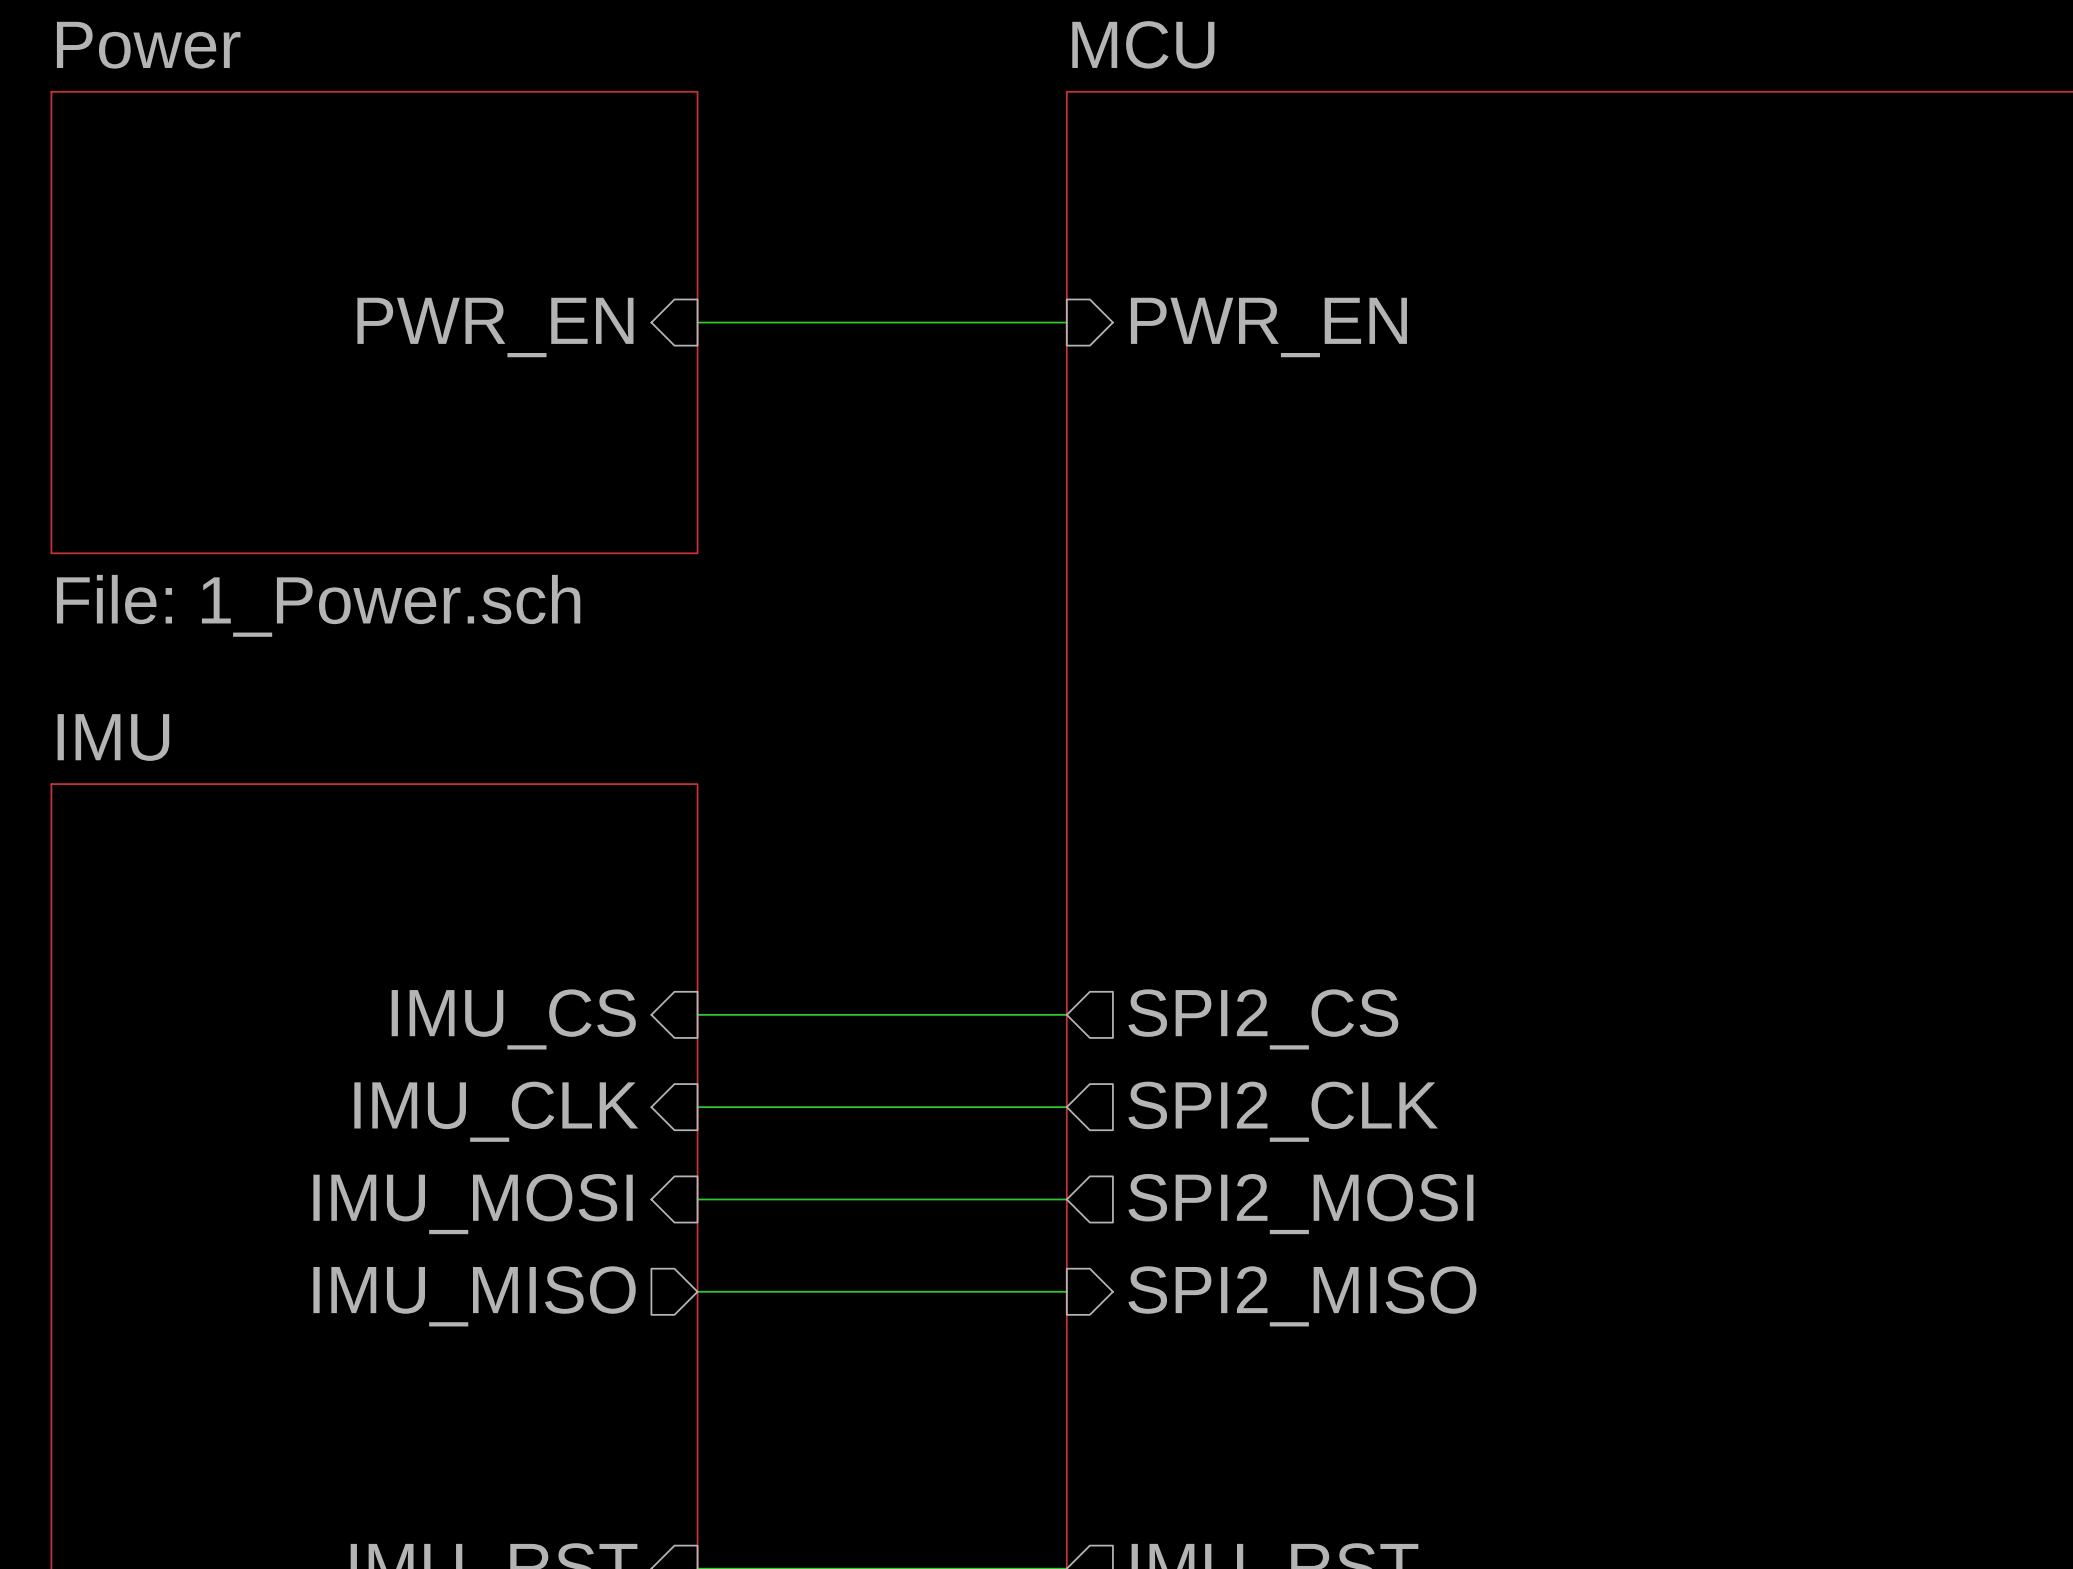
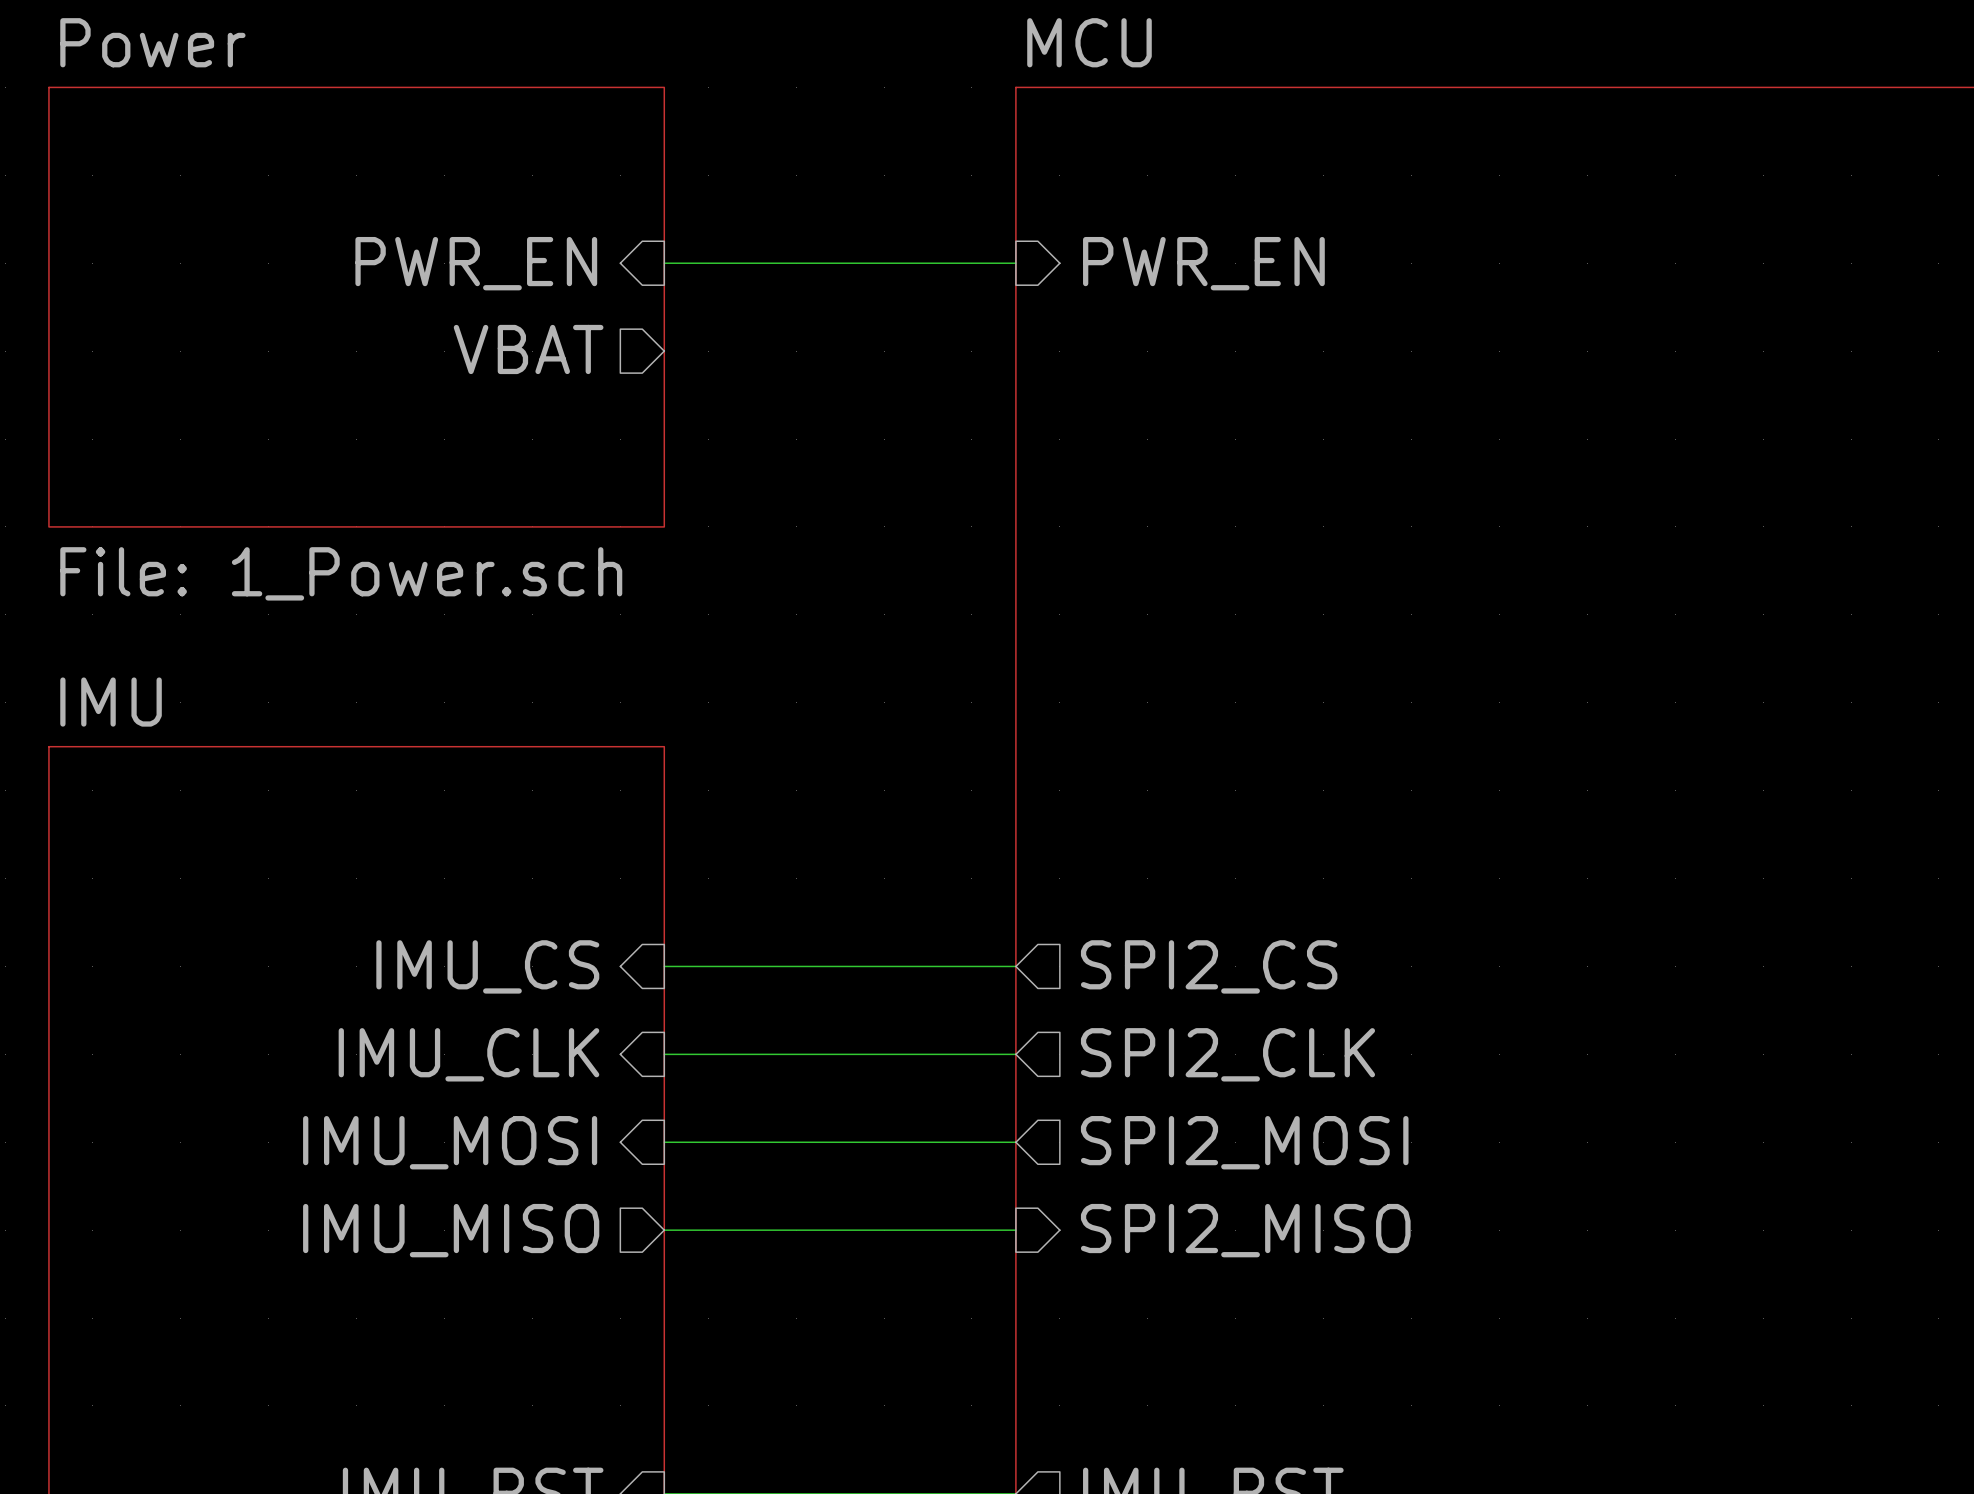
wire: (697, 322) (1066, 322) -> (664, 263) (1015, 263)
sheet pin position: PWR_EN (495, 327) -> PWR_EN (476, 263)
sheet pin position: PWR_EN (1268, 327) -> PWR_EN (1203, 263)
sheet pin: none -> VBAT (528, 349)

